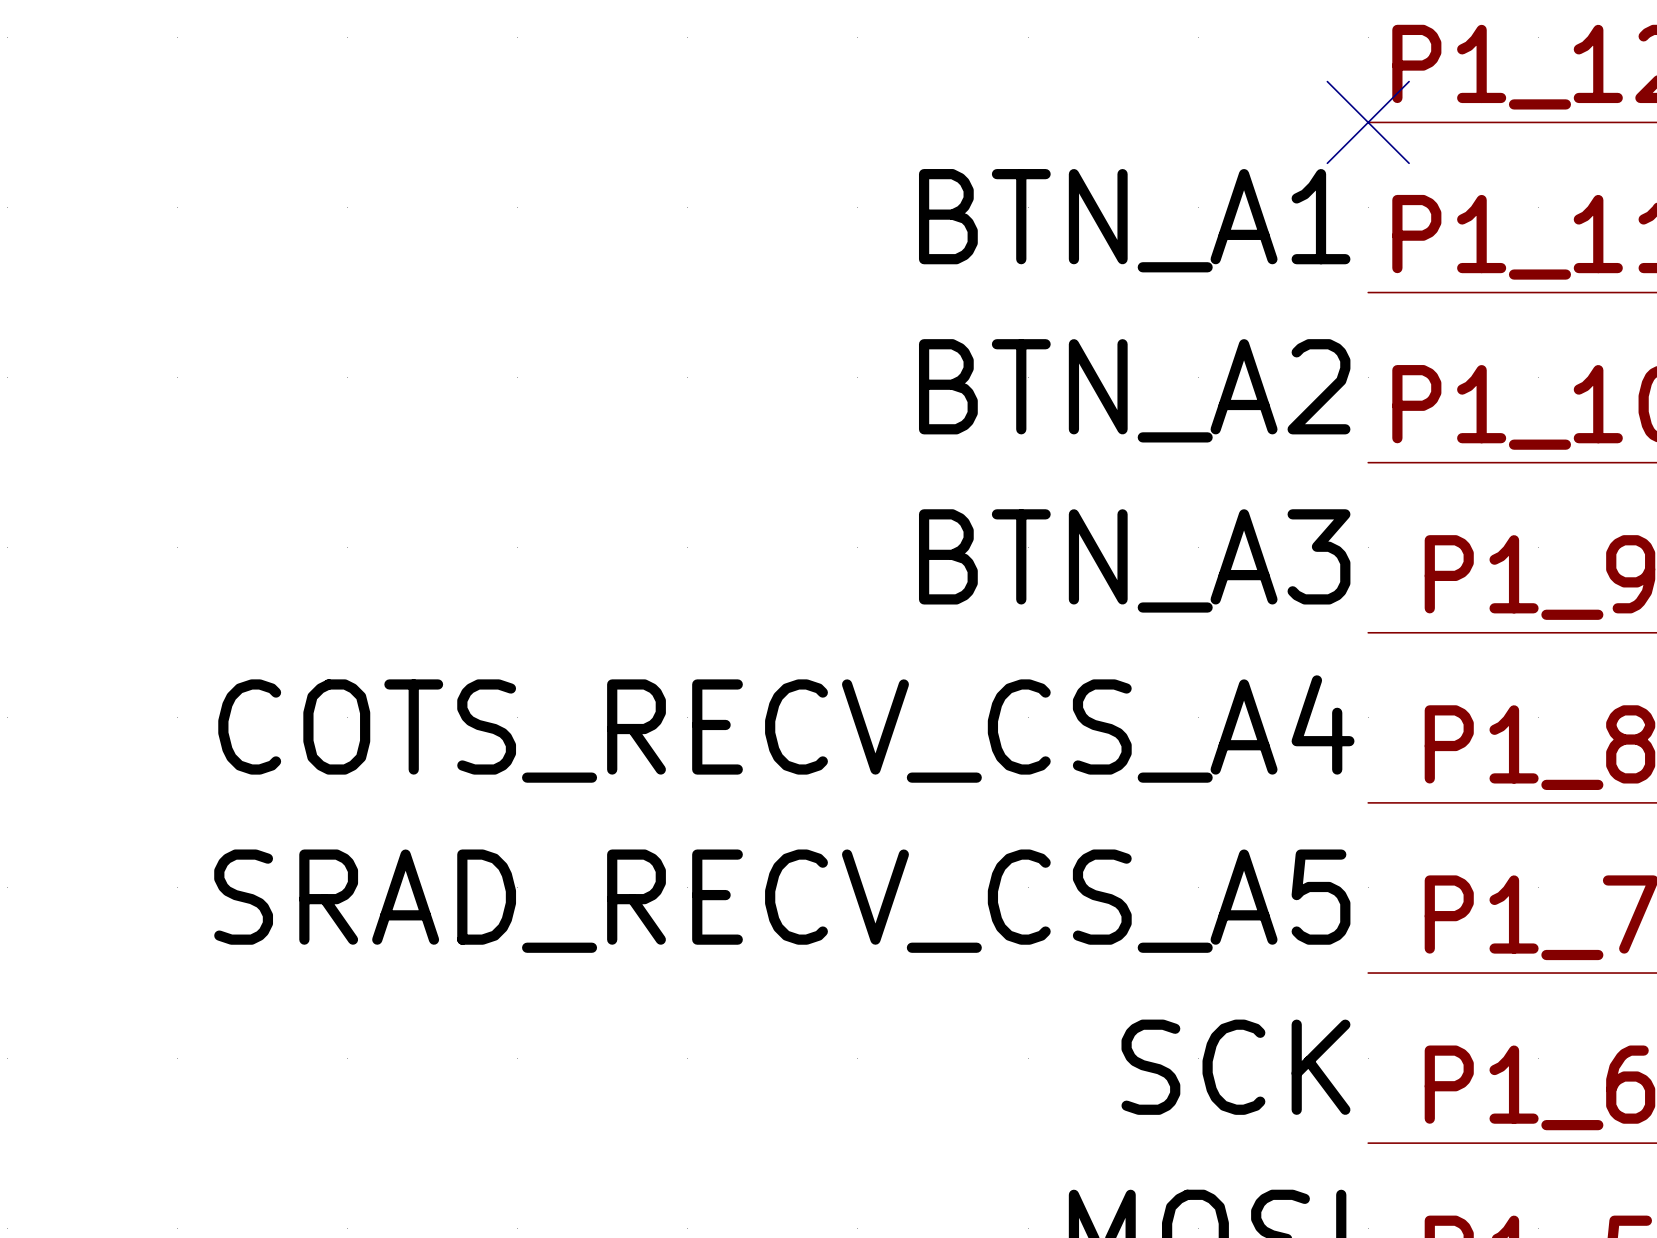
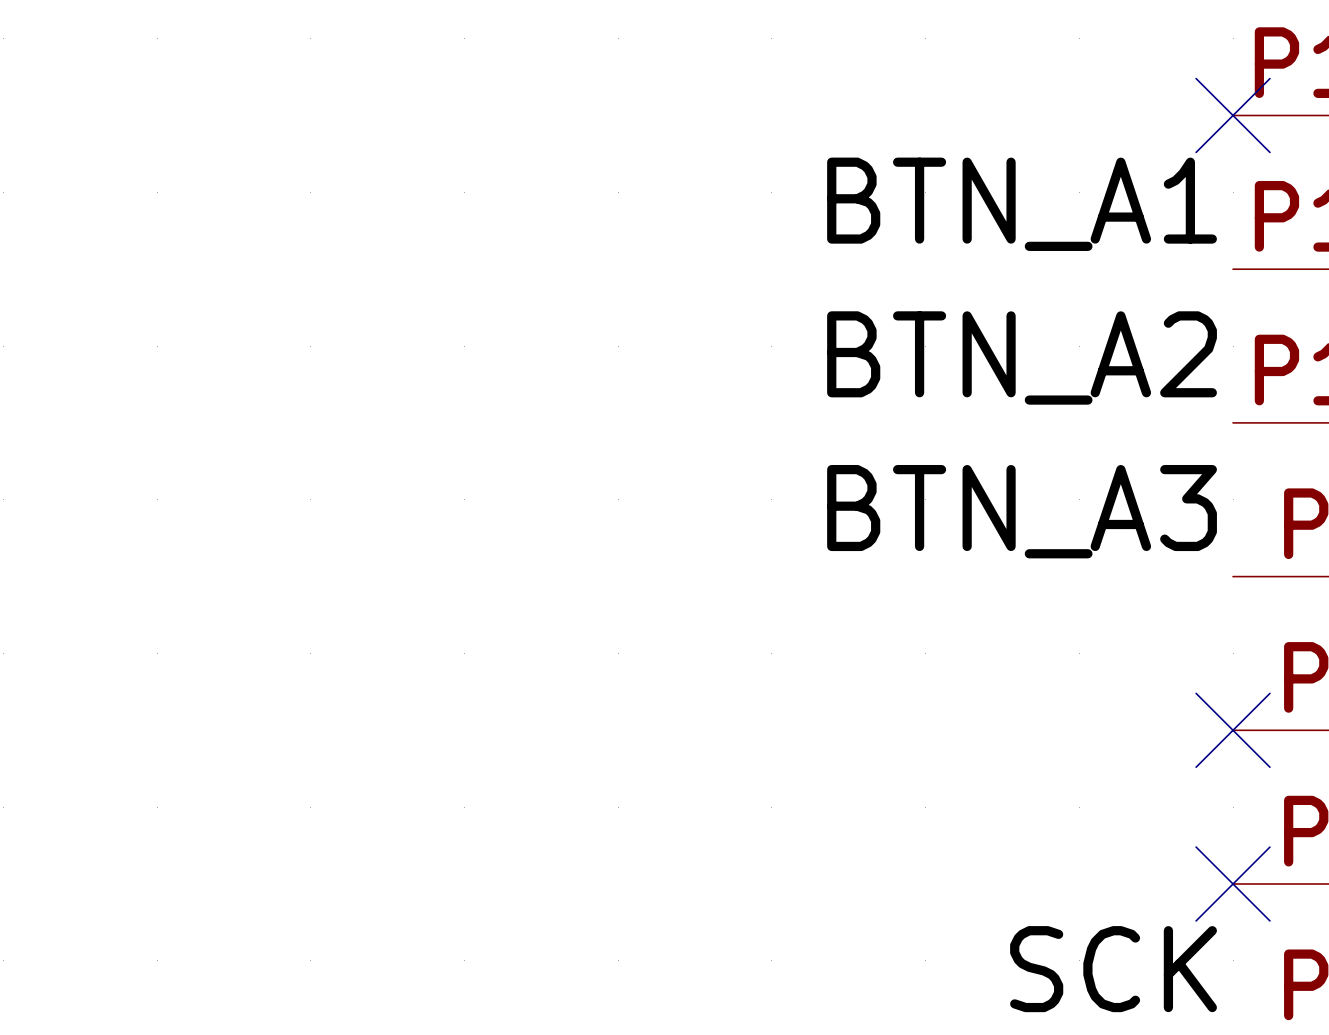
label: COTS_RECV_CS_A4 (786, 729) -> none
no-connect mark: none -> (1233, 730)
label: SRAD_RECV_CS_A5 (782, 901) -> none
no-connect mark: none -> (1233, 884)

